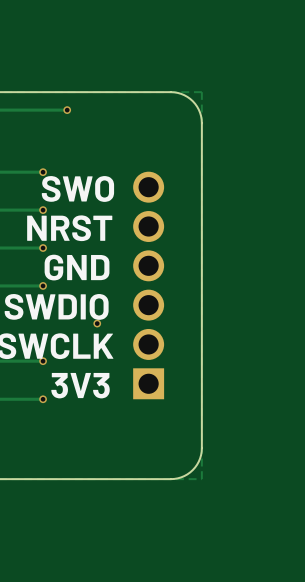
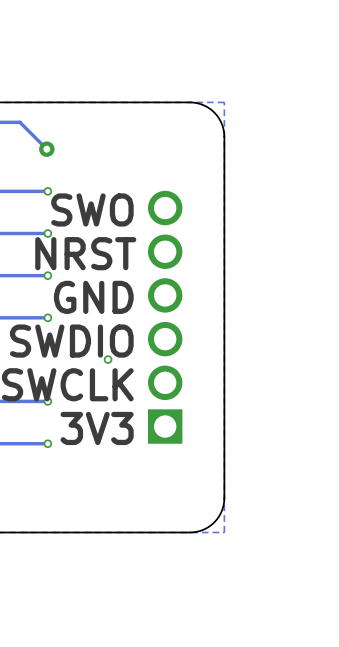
track: (67, 110) (17, 110) -> (46, 149) (19, 122)
via: (67, 110) -> none
via: none -> (46, 149)

